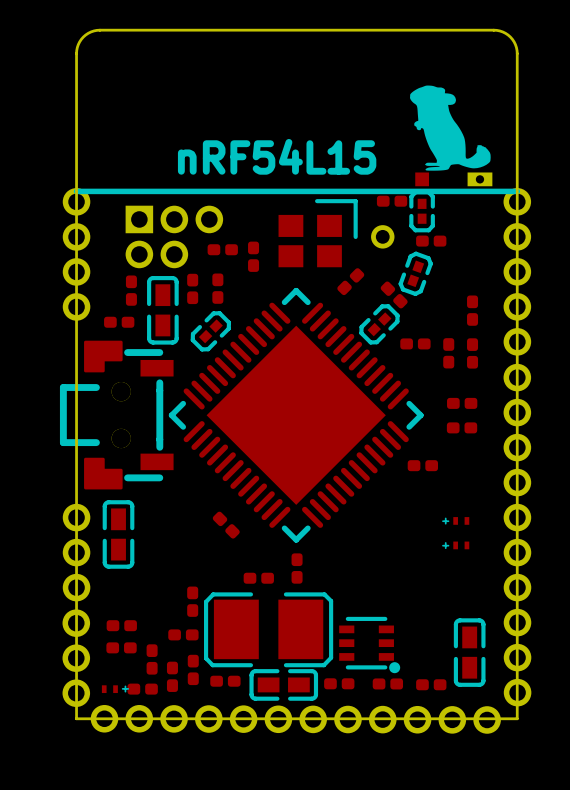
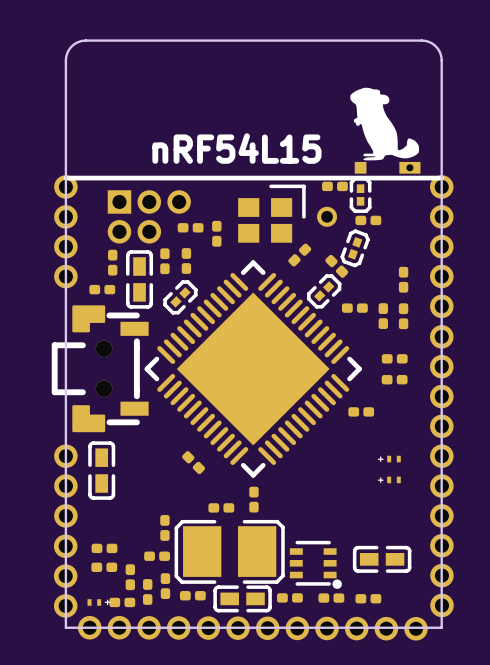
part rotation: 0° (469, 652) -> 90° clockwise (382, 559)

